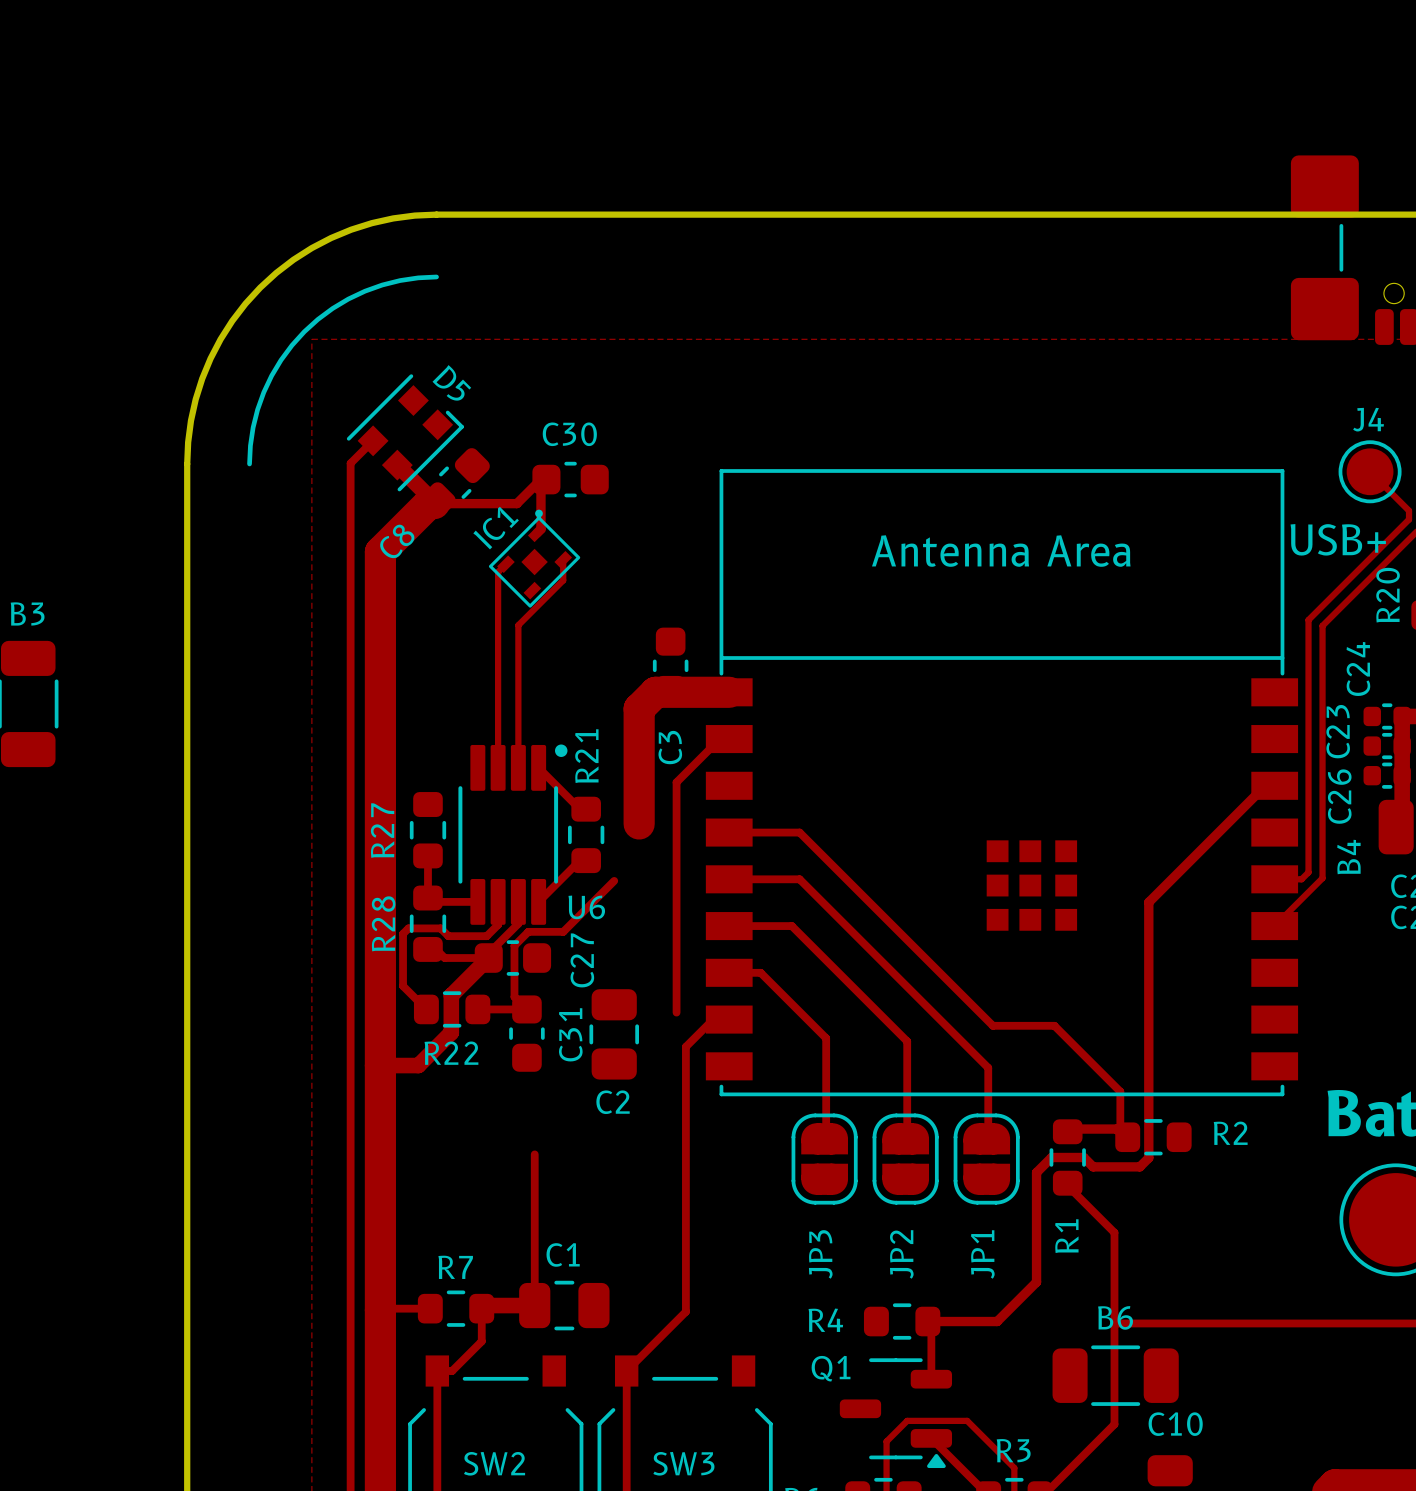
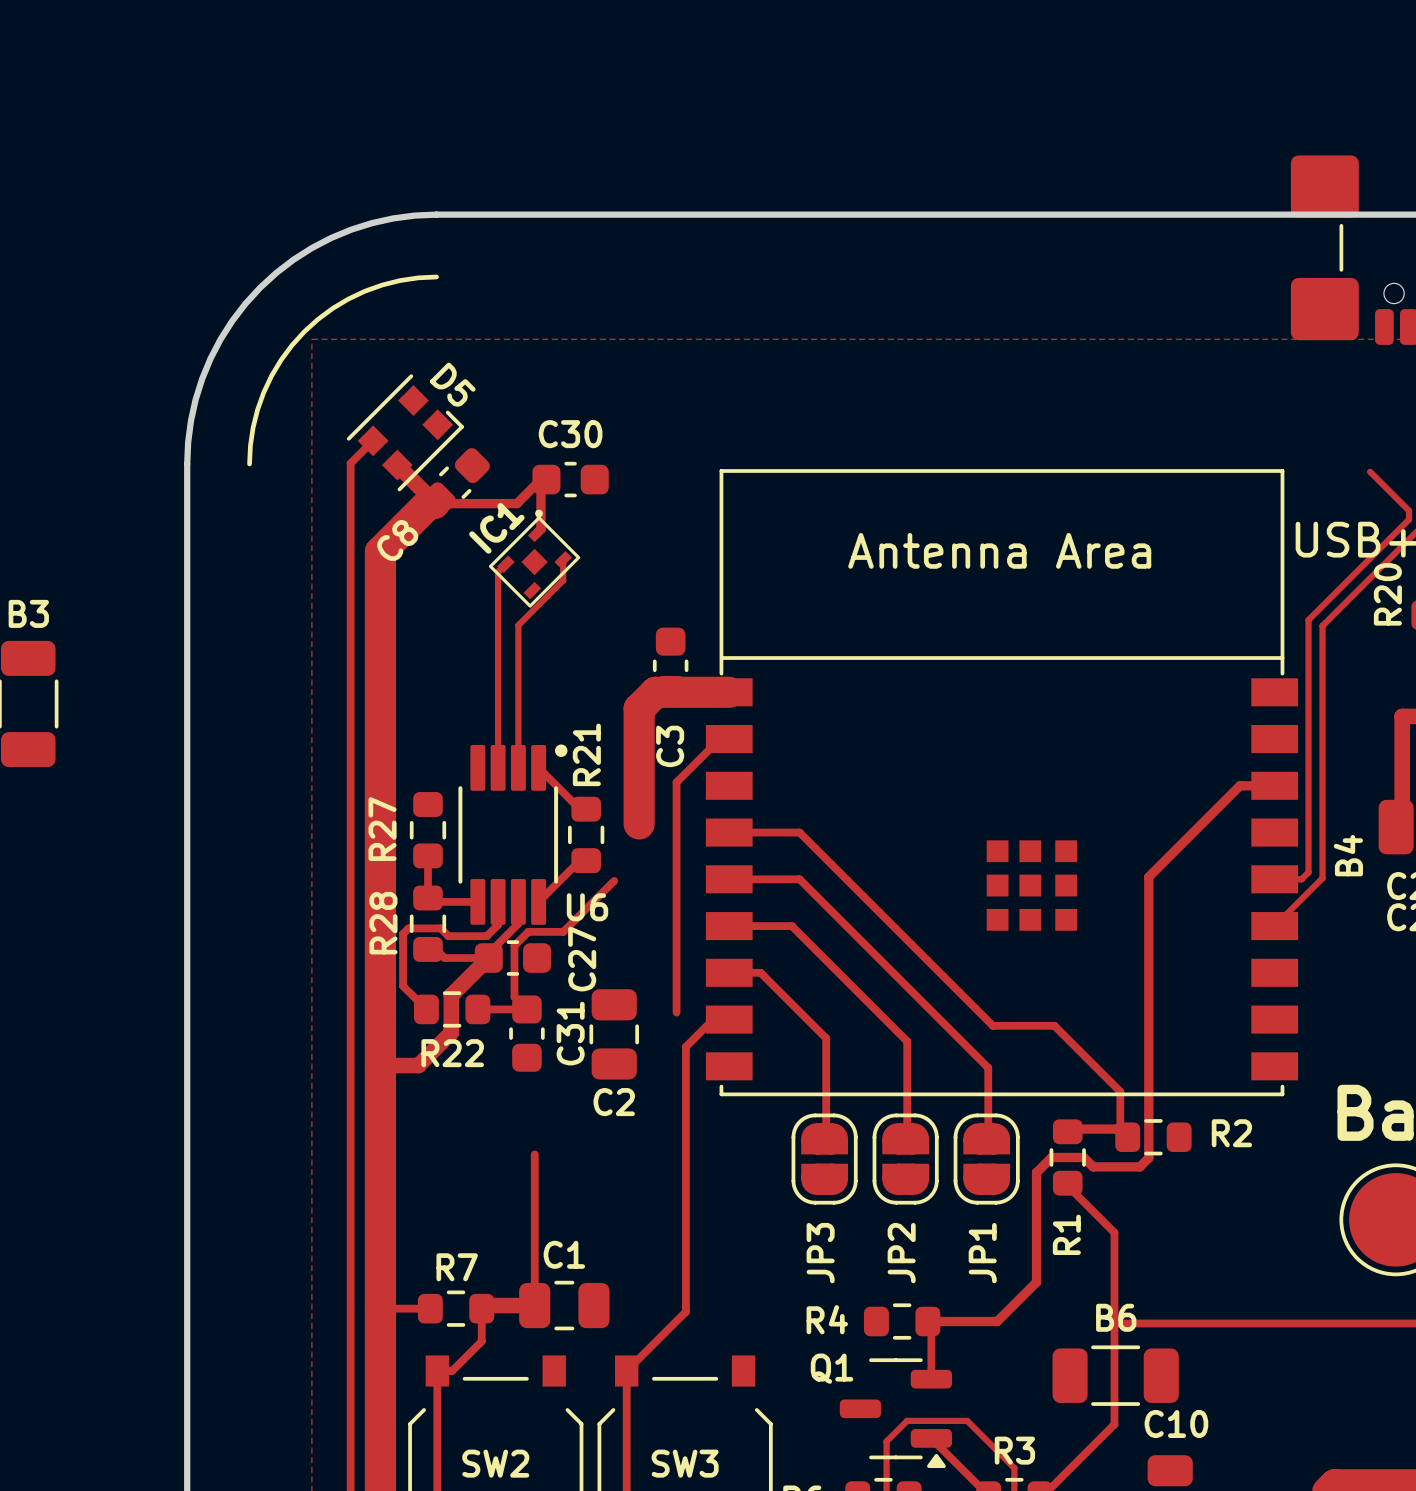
J4: (1370, 471) -> none
C24: (1387, 716) -> none
C23: (1387, 746) -> none
C26: (1387, 775) -> none
top track: (1265, 785) (1148, 902) -> (1265, 785) (1239, 785) (1148, 876) (1148, 902)

